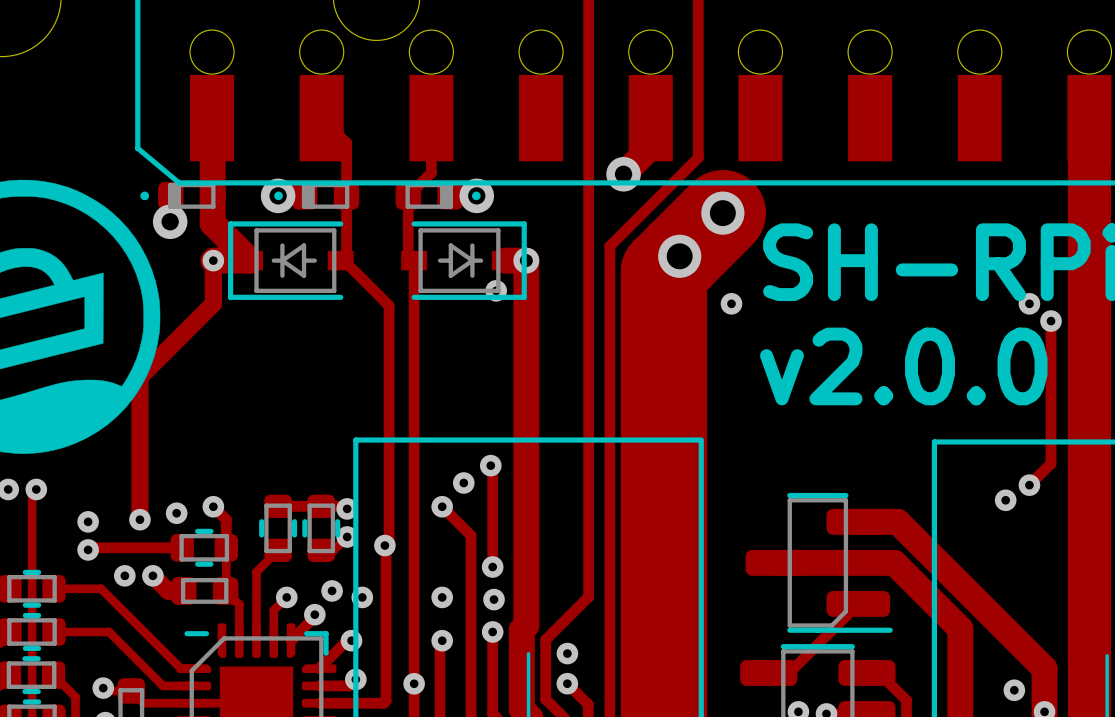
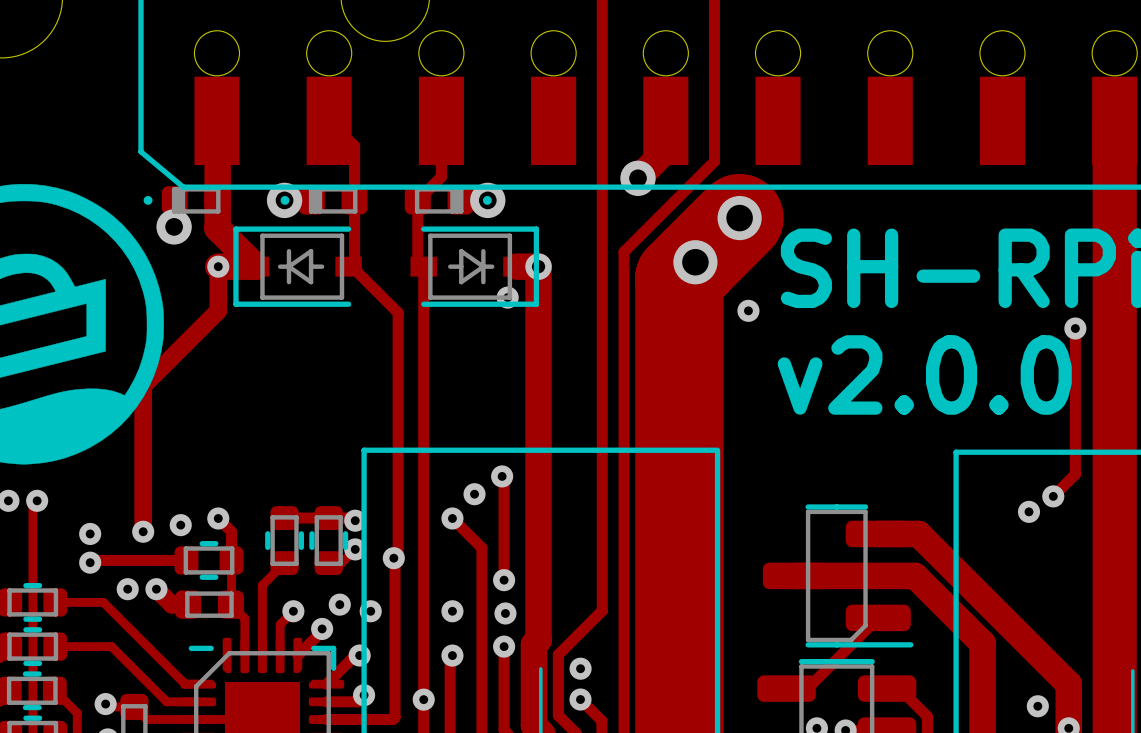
via: (1029, 303) -> none

